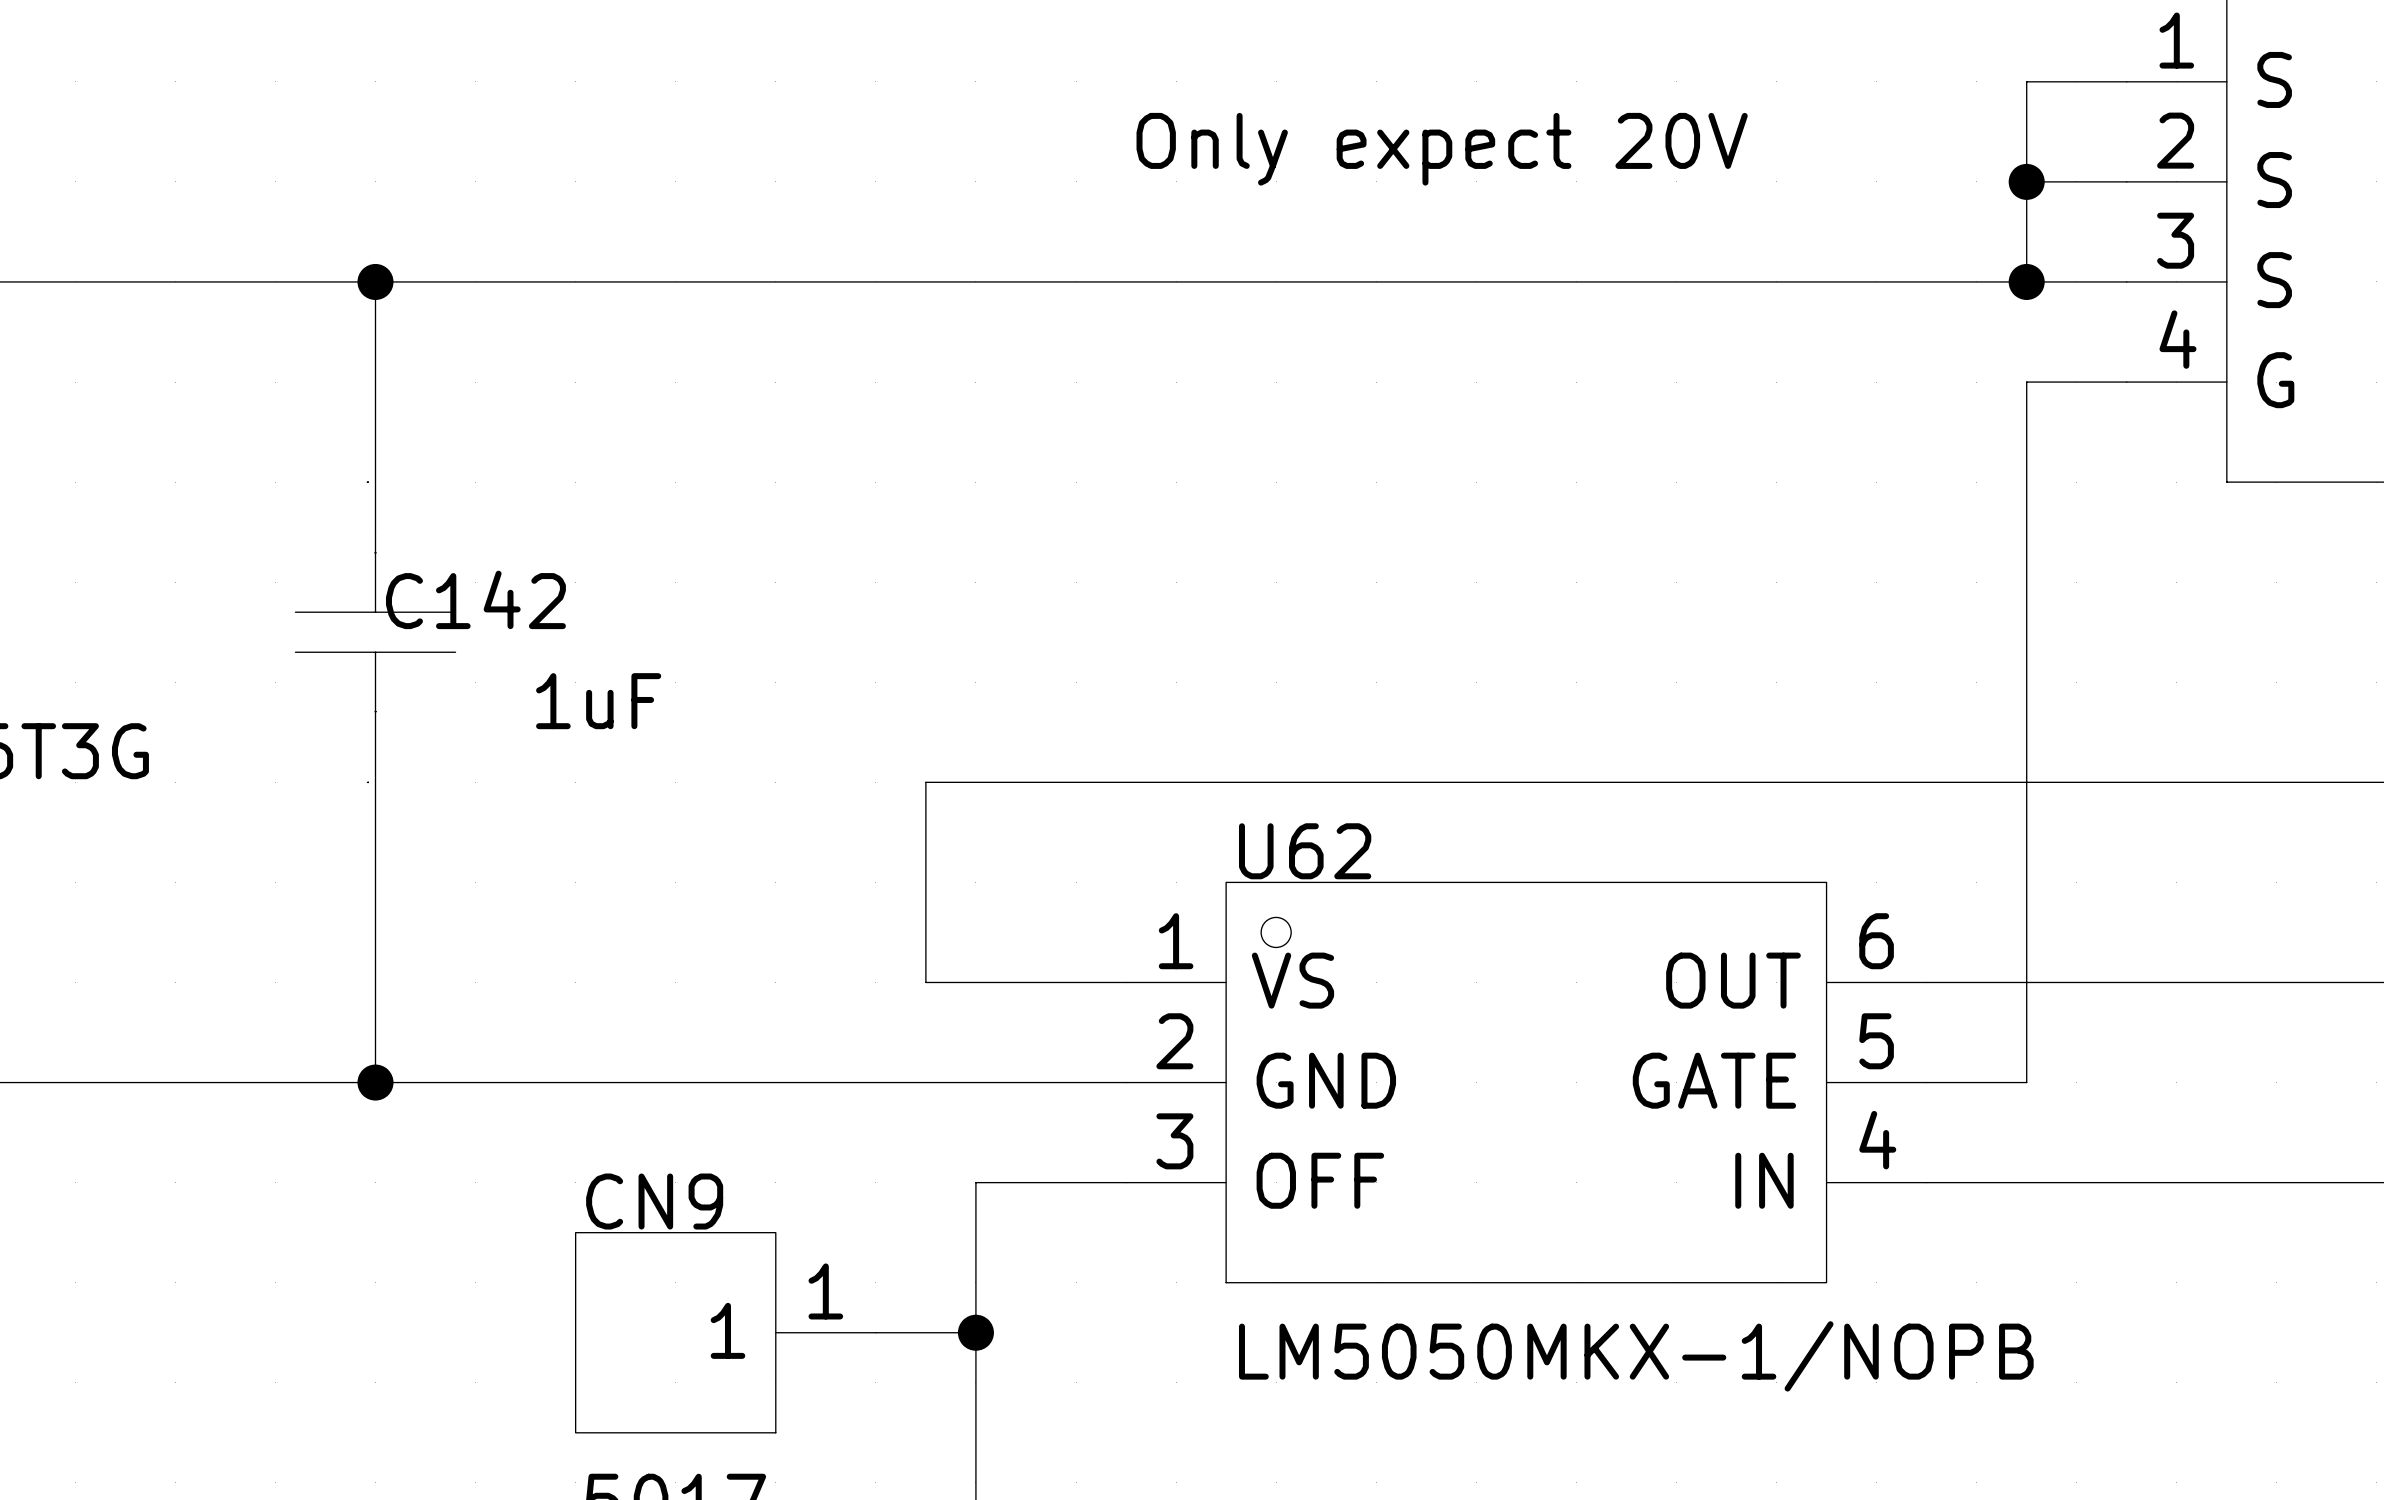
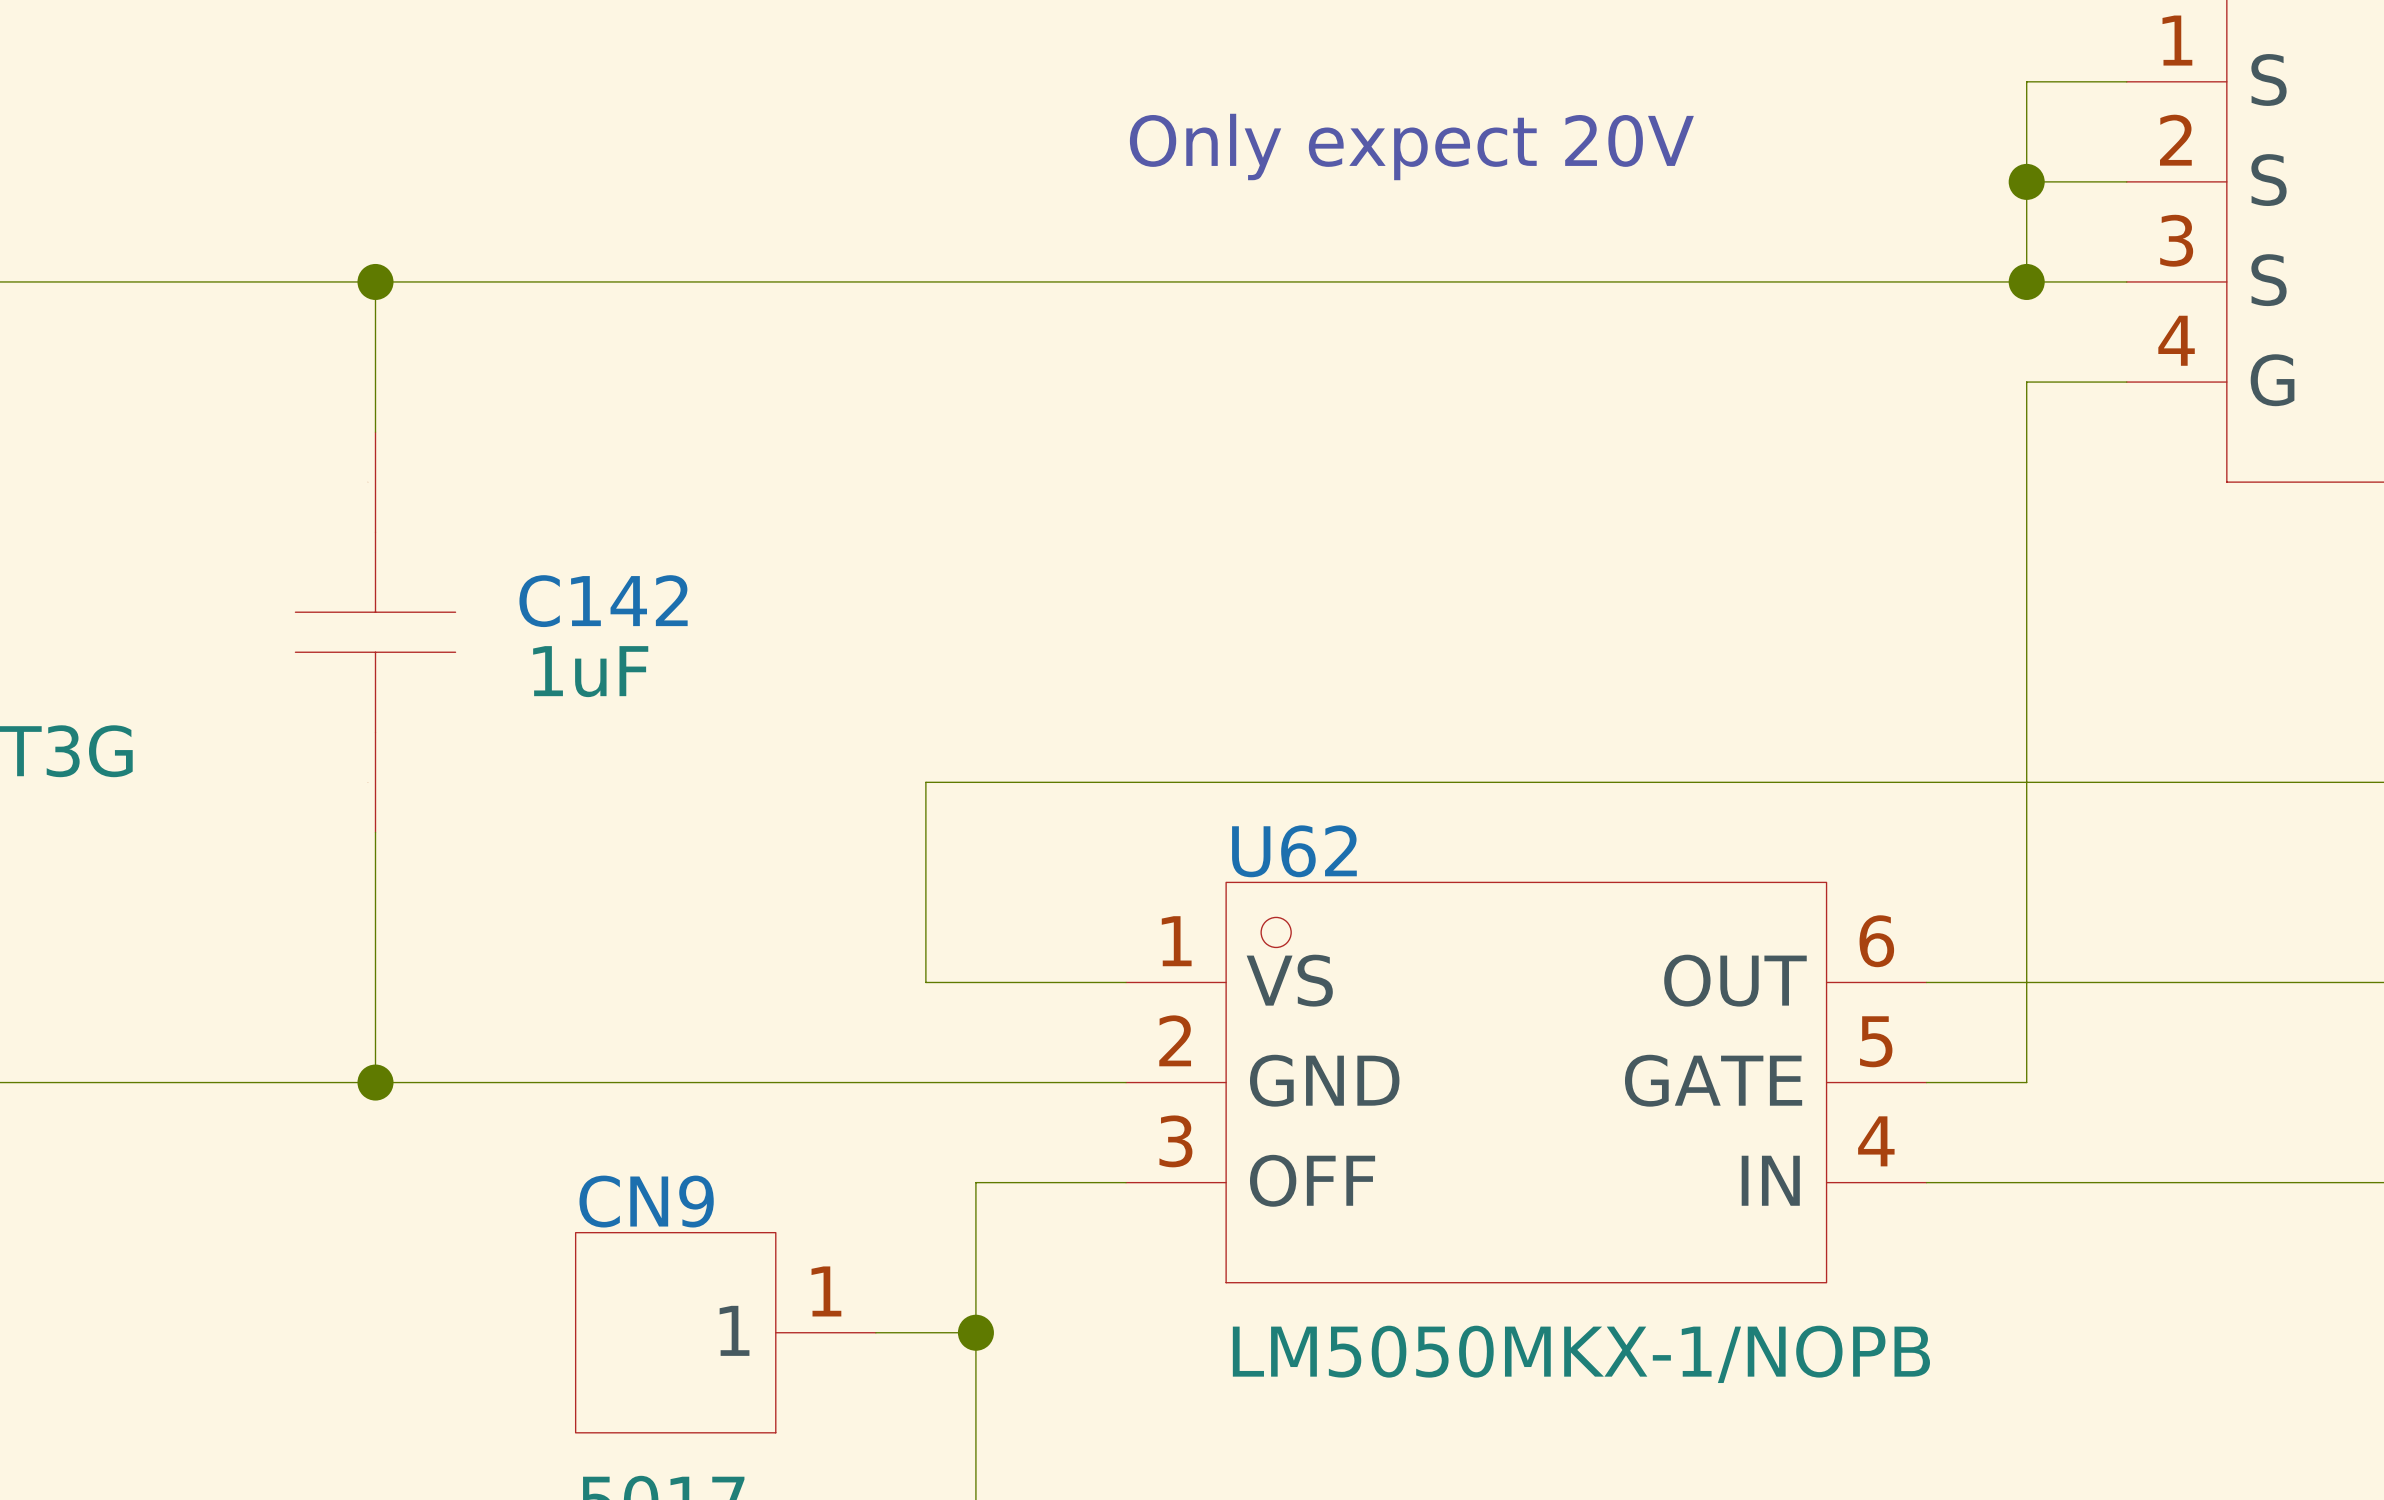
C142 name position: C142 (475, 599) -> C142 (603, 601)
C142 value position: 1uF (598, 701) -> 1uF (590, 671)

